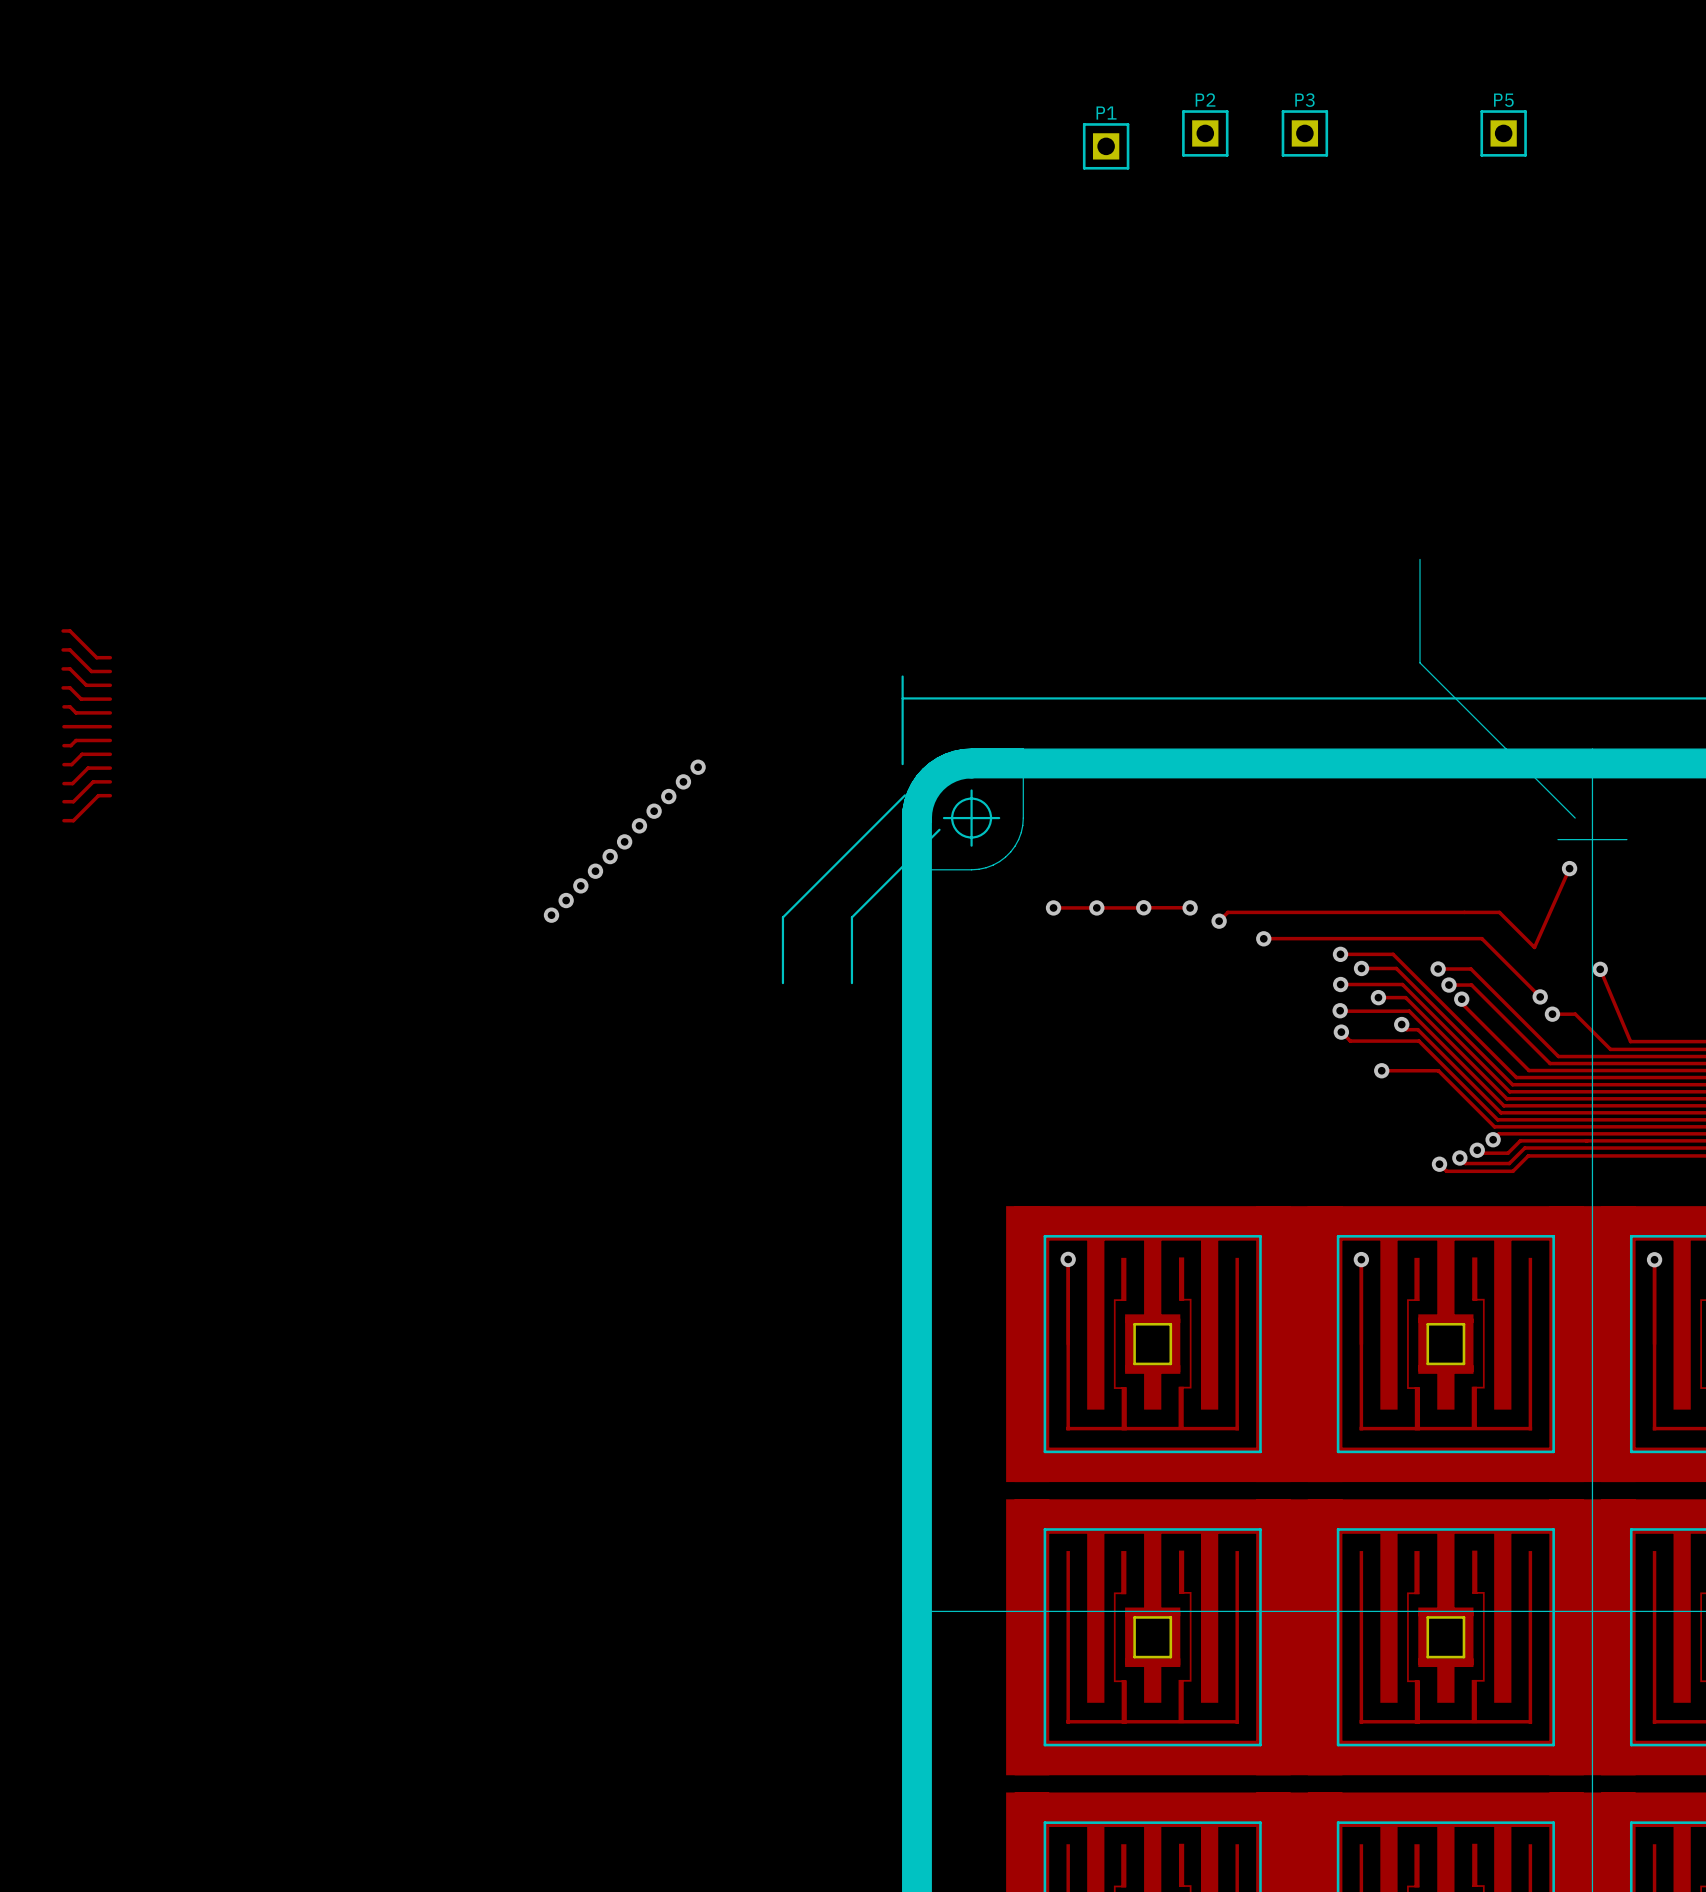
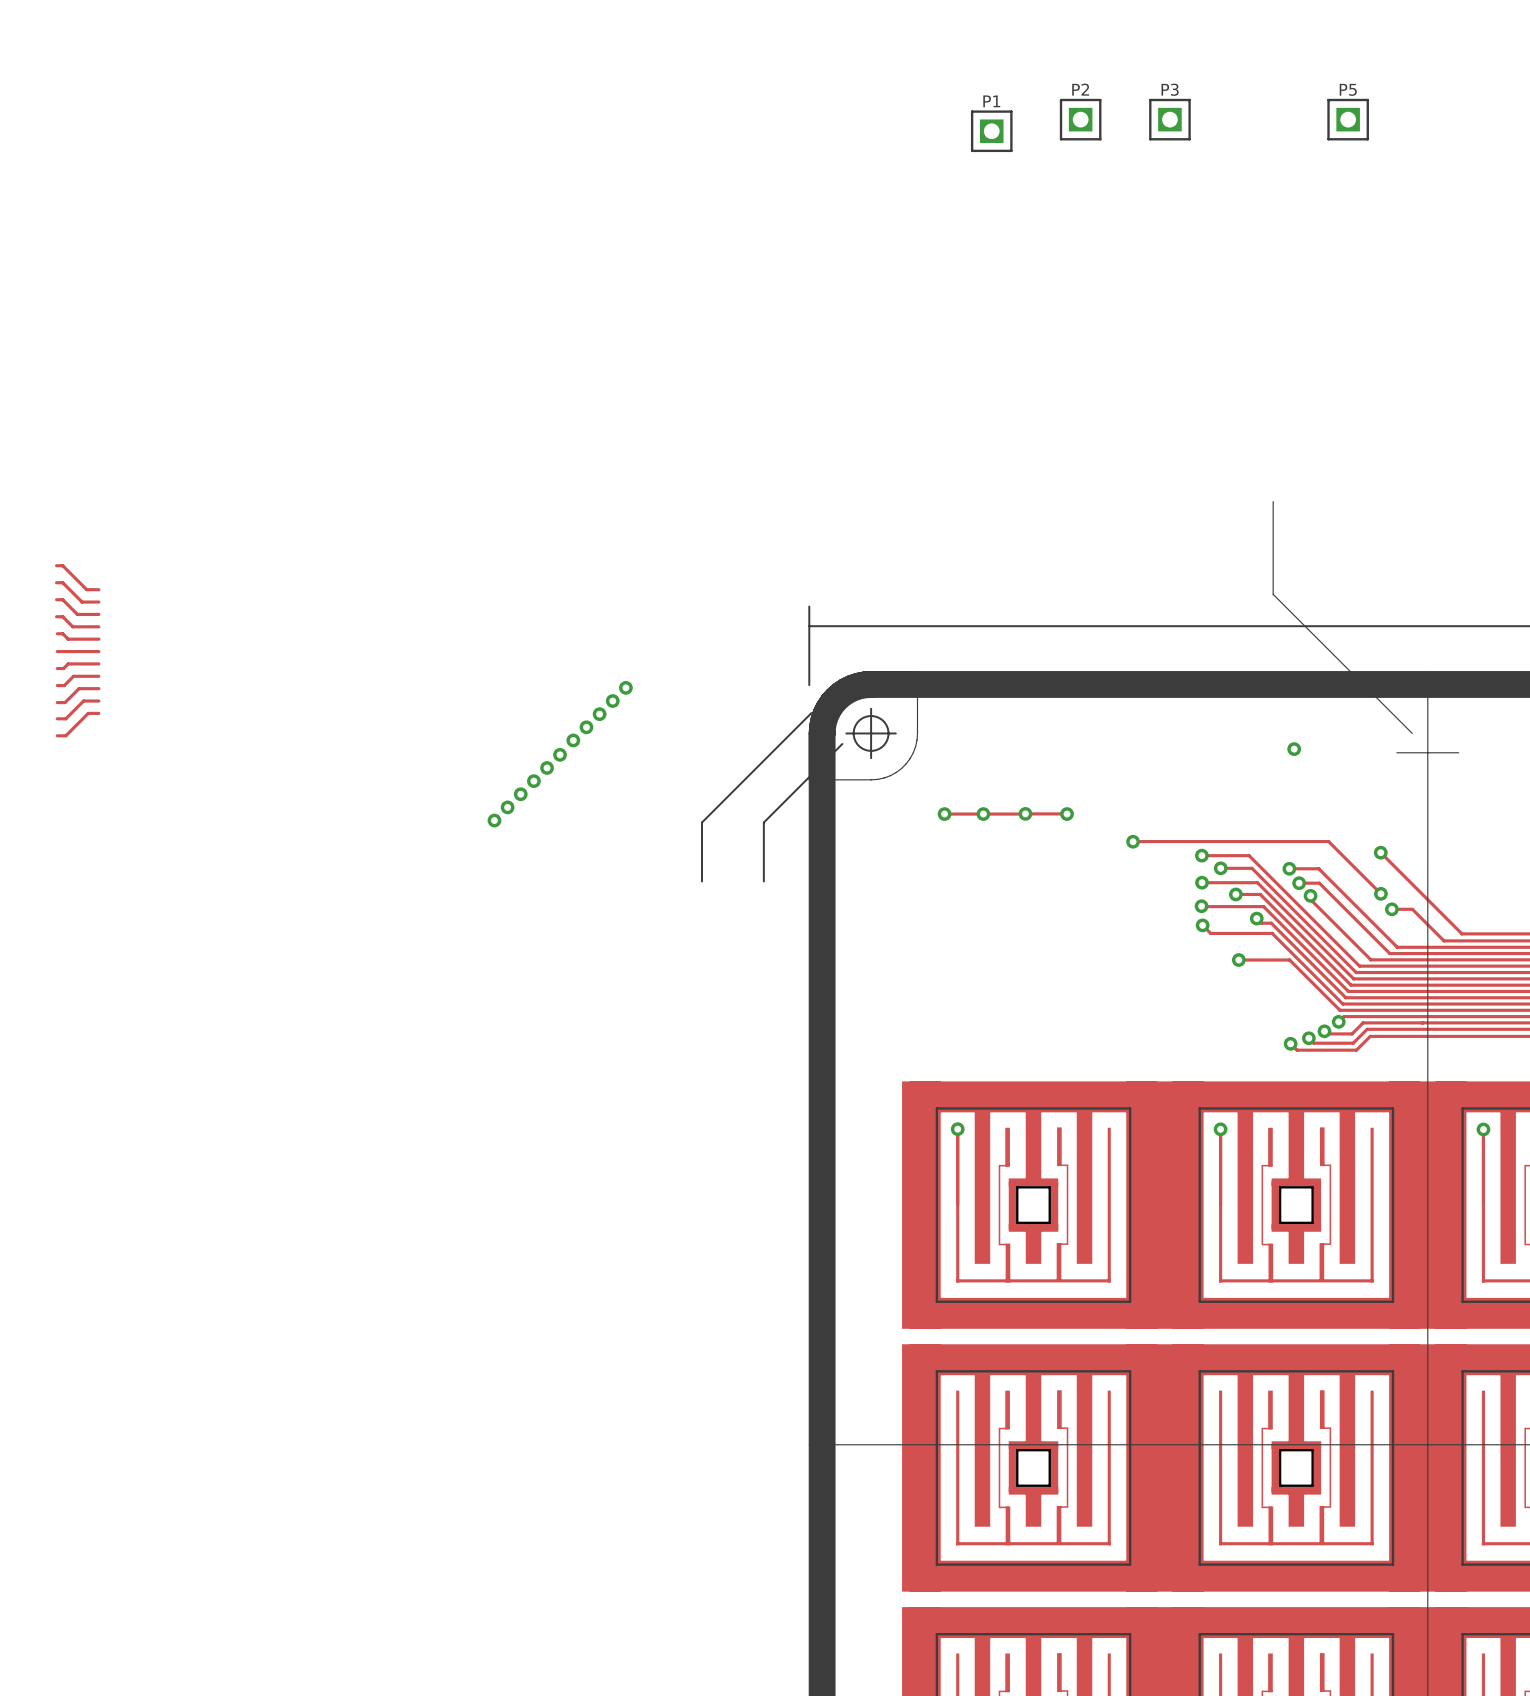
via: none -> (1294, 749)
track: (1569, 868) (1534, 947) (1499, 912) (1227, 912) (1219, 921) -> none
via: (1569, 868) -> none
via: (1219, 921) -> none
via: none -> (1380, 852)
track: (1600, 969) (1630, 1041) -> (1380, 852) (1461, 933)
via: (1600, 969) -> none

